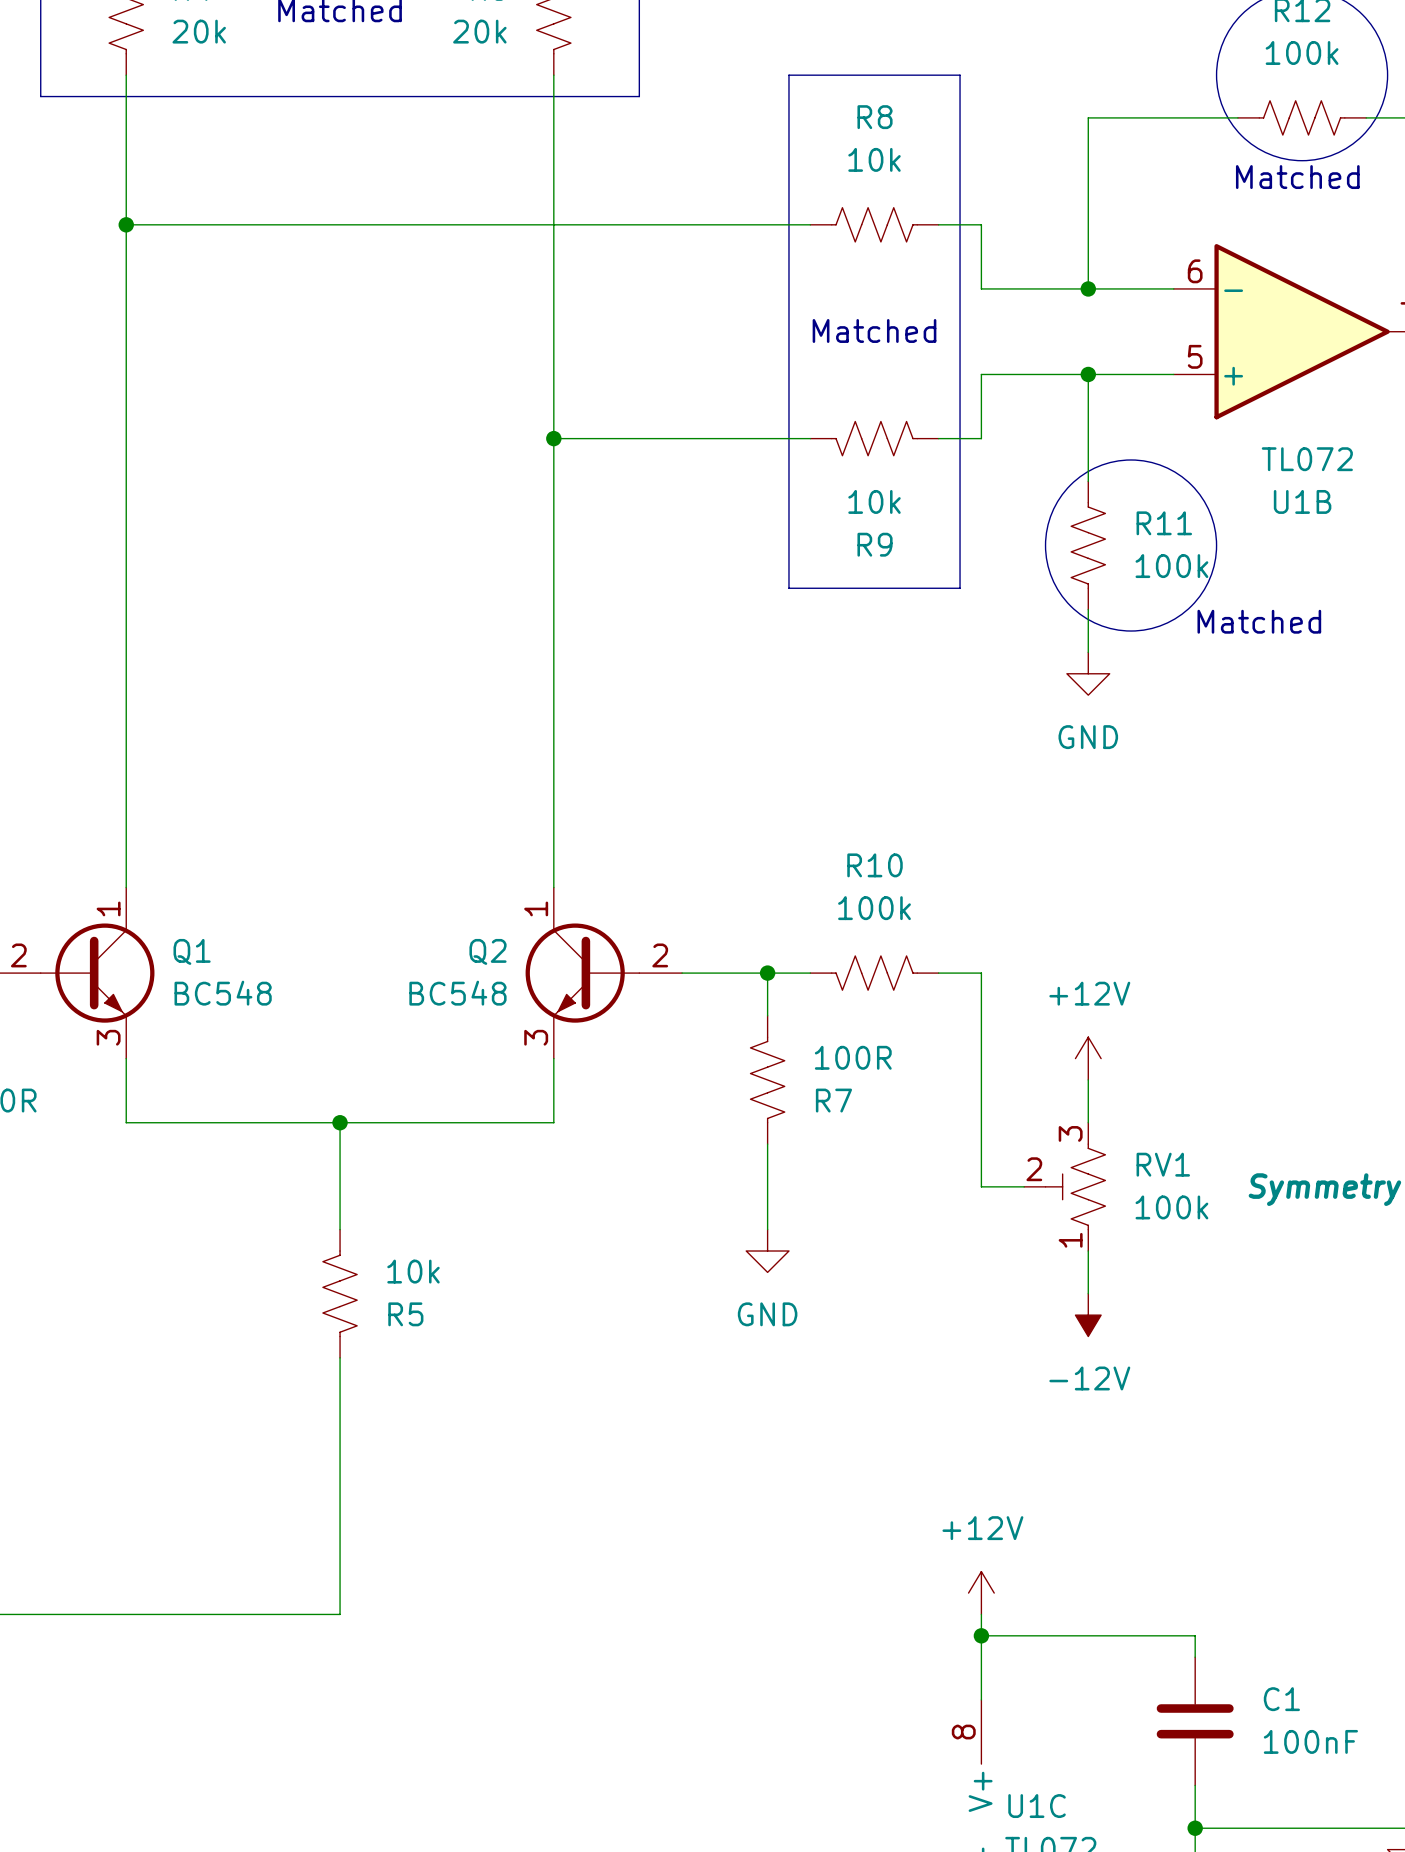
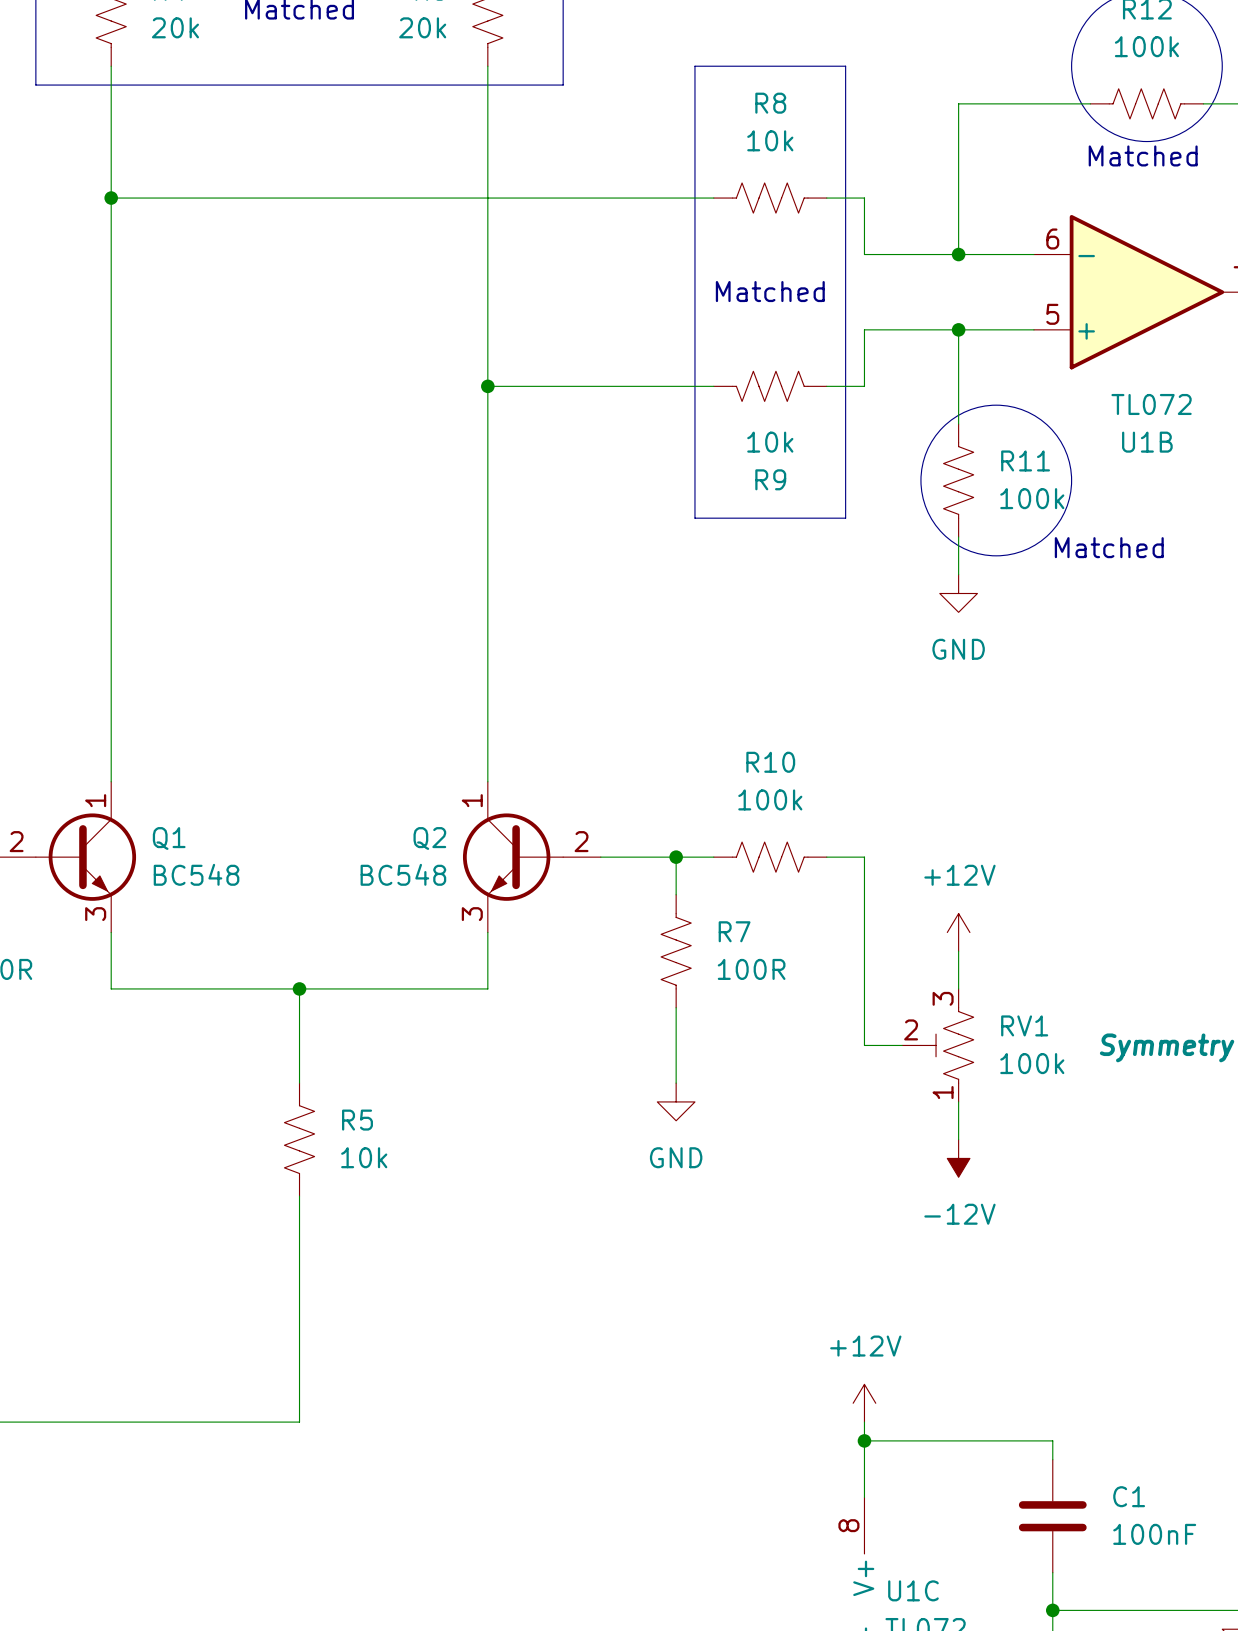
R10 flip: as is (874, 973) -> left-right (770, 857)
R7 value position: 100R (853, 1057) -> 100R (751, 969)
R7 flip: as is (767, 1079) -> left-right (676, 951)
R7 name position: R7 (833, 1100) -> R7 (734, 931)
R5 value position: 10k (413, 1271) -> 10k (364, 1157)
R5 flip: as is (340, 1293) -> left-right (299, 1139)
R5 name position: R5 (405, 1314) -> R5 (357, 1120)

